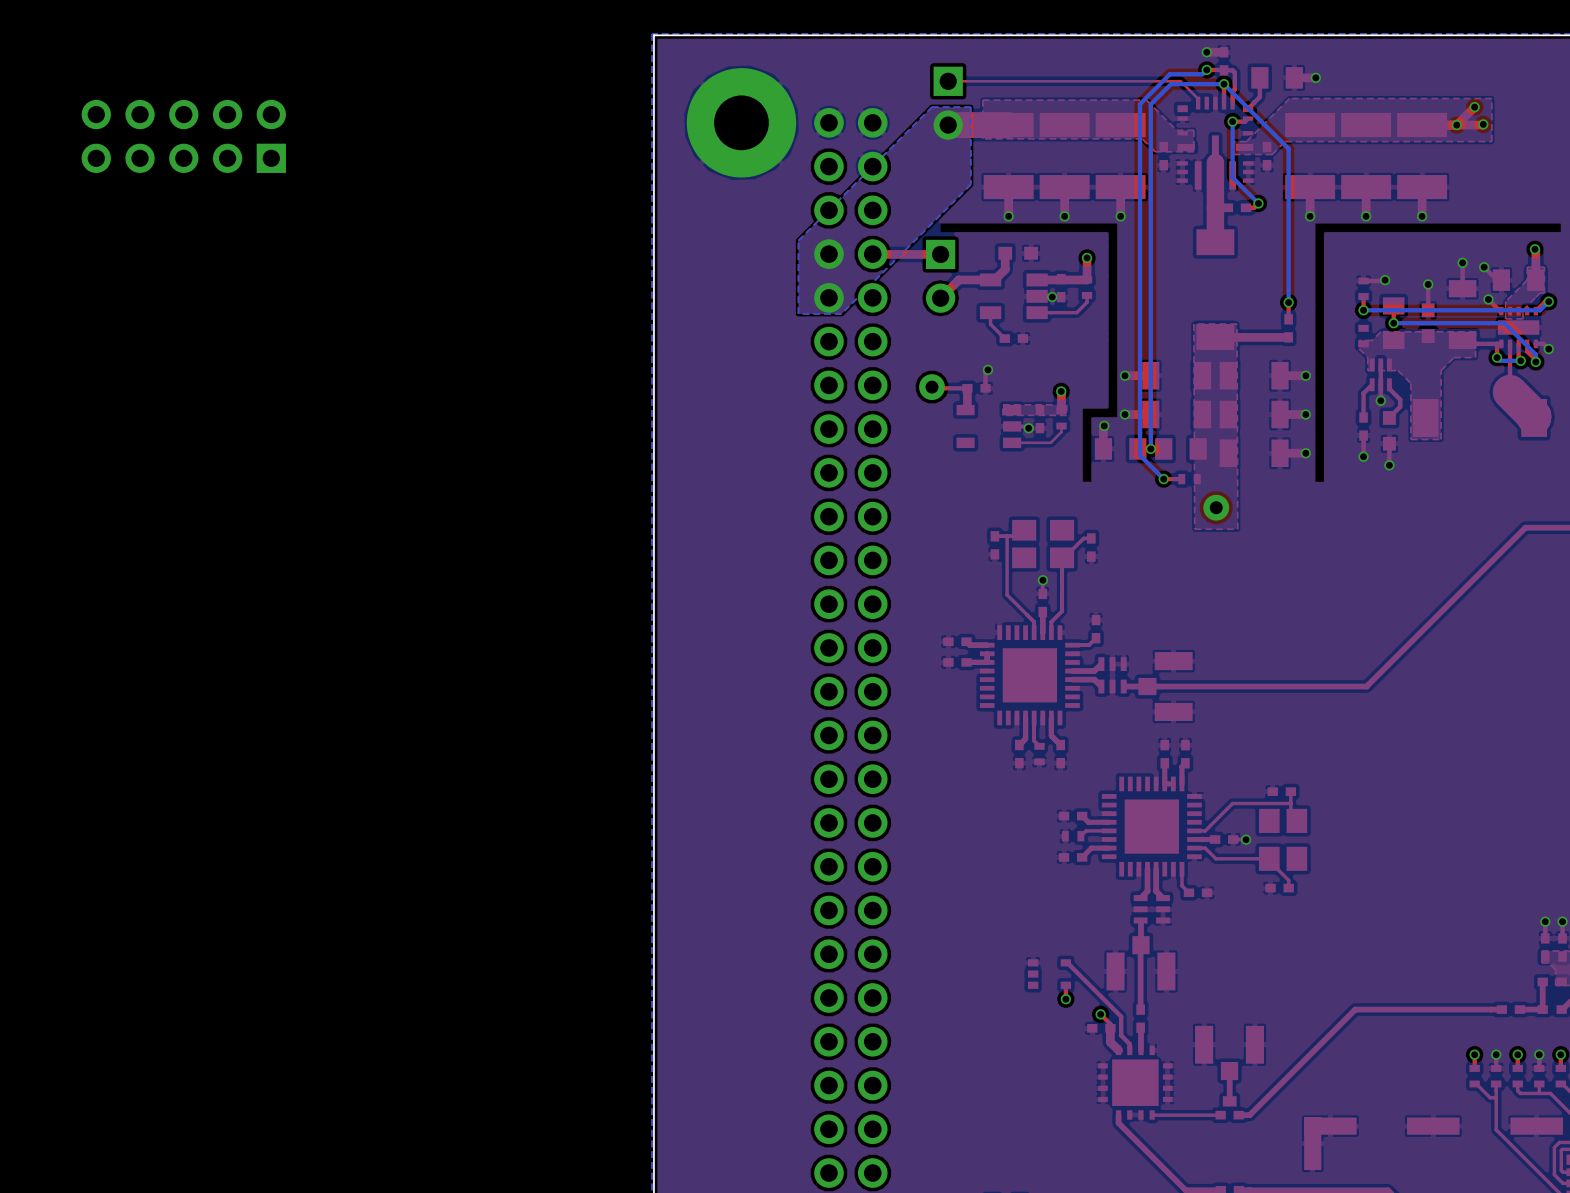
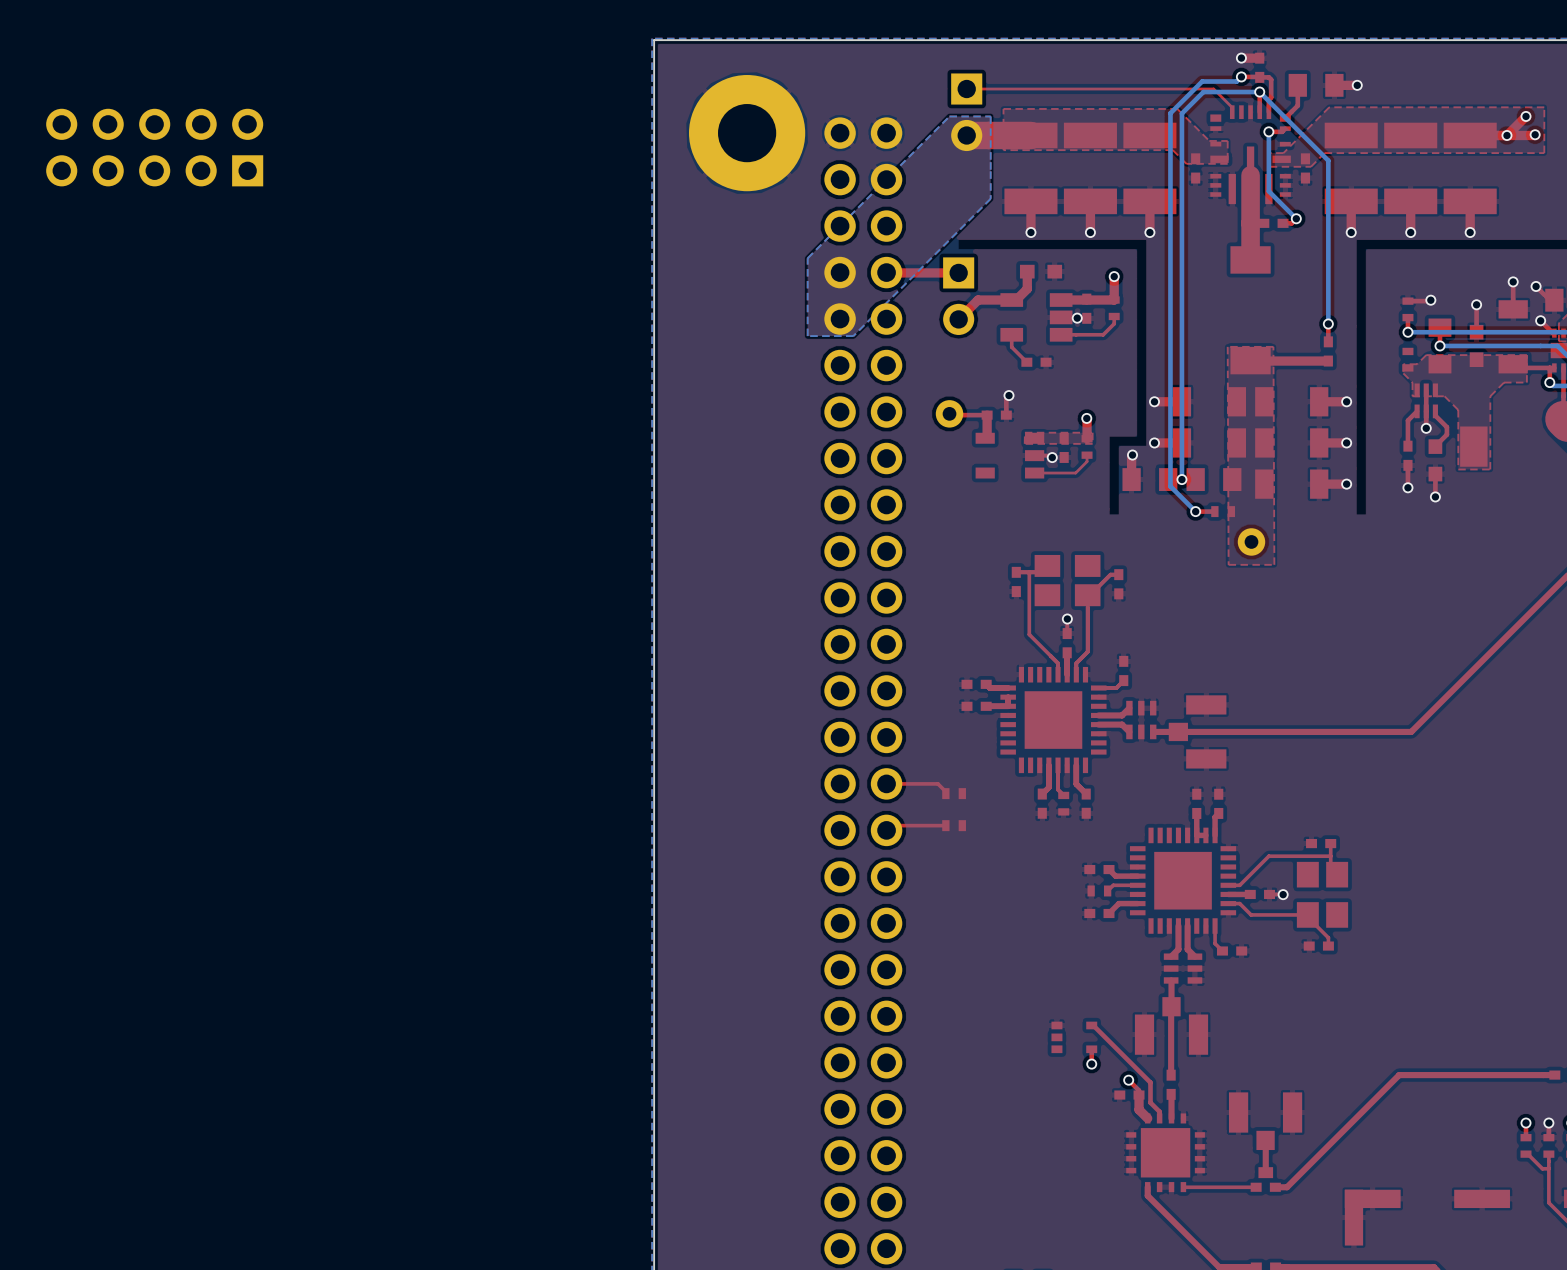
top track: none -> (886, 783) (937, 783) (945, 793)
part: none -> (954, 793)
top track: none -> (945, 825) (891, 825) (886, 830)
part: none -> (954, 825)

